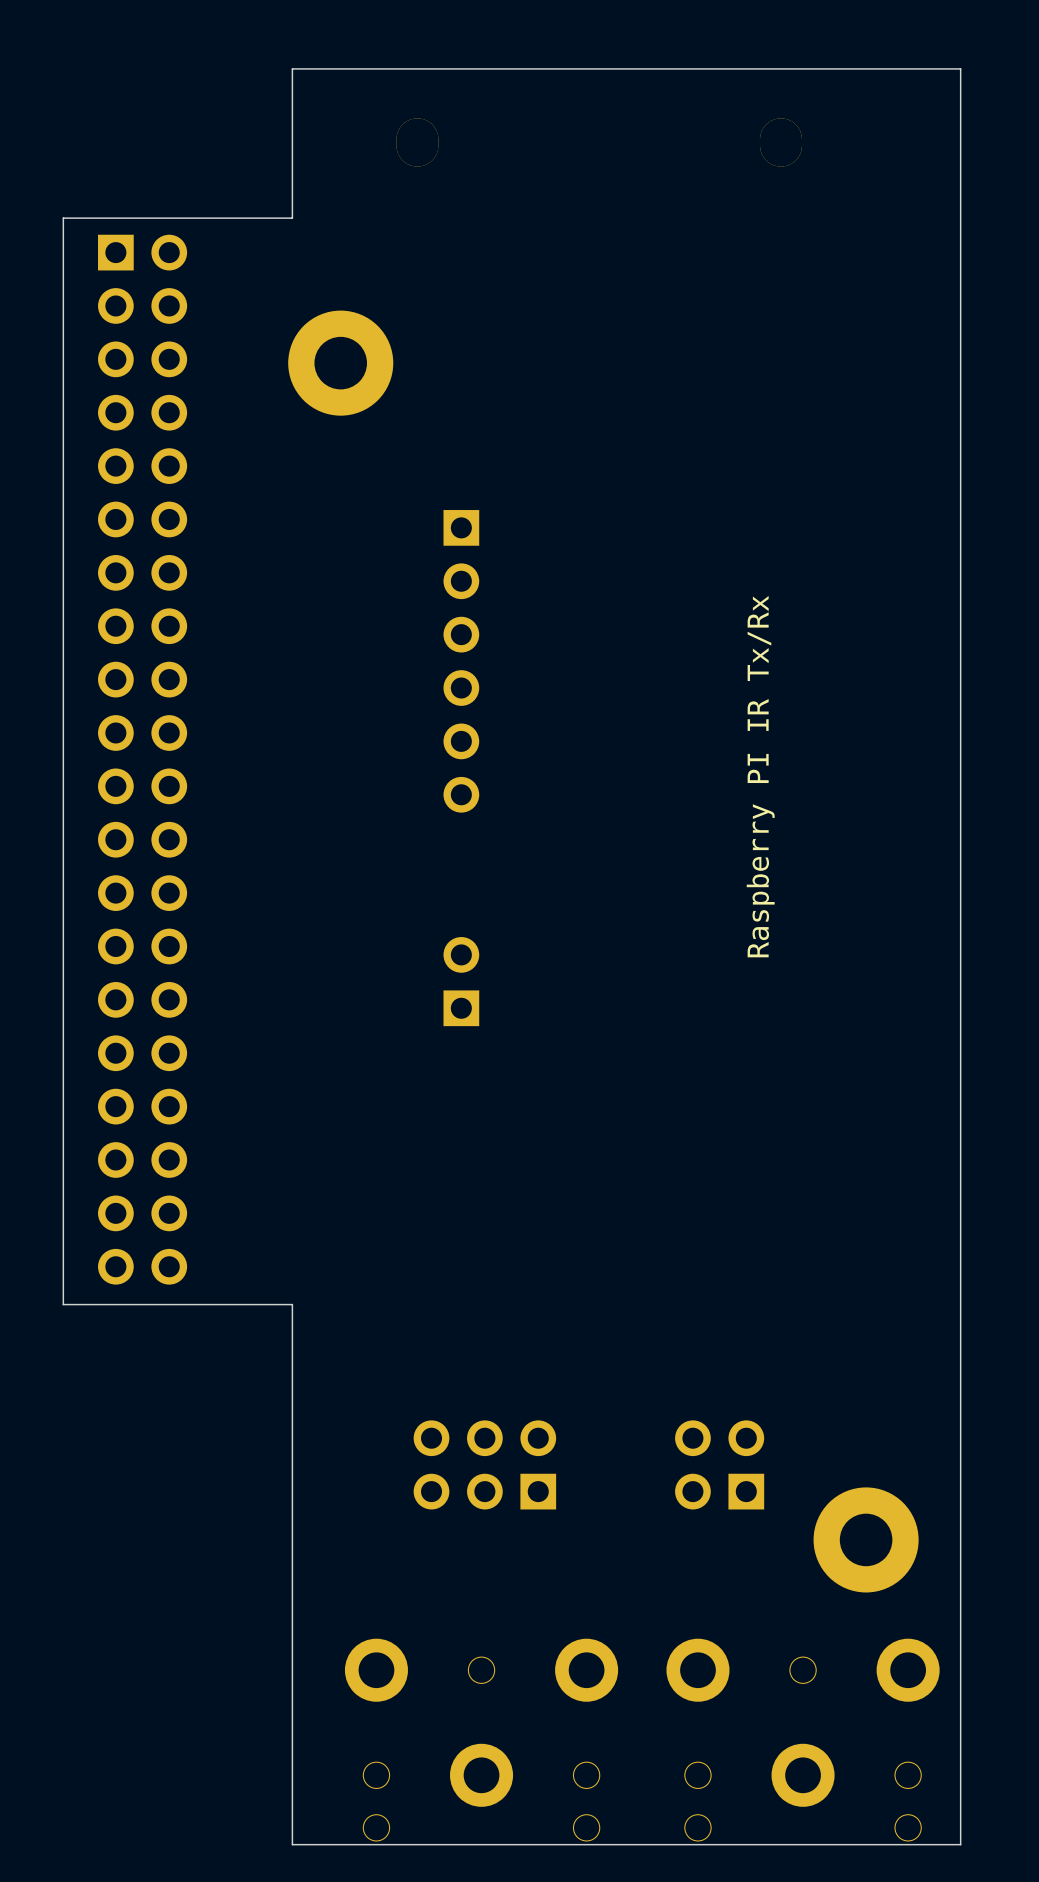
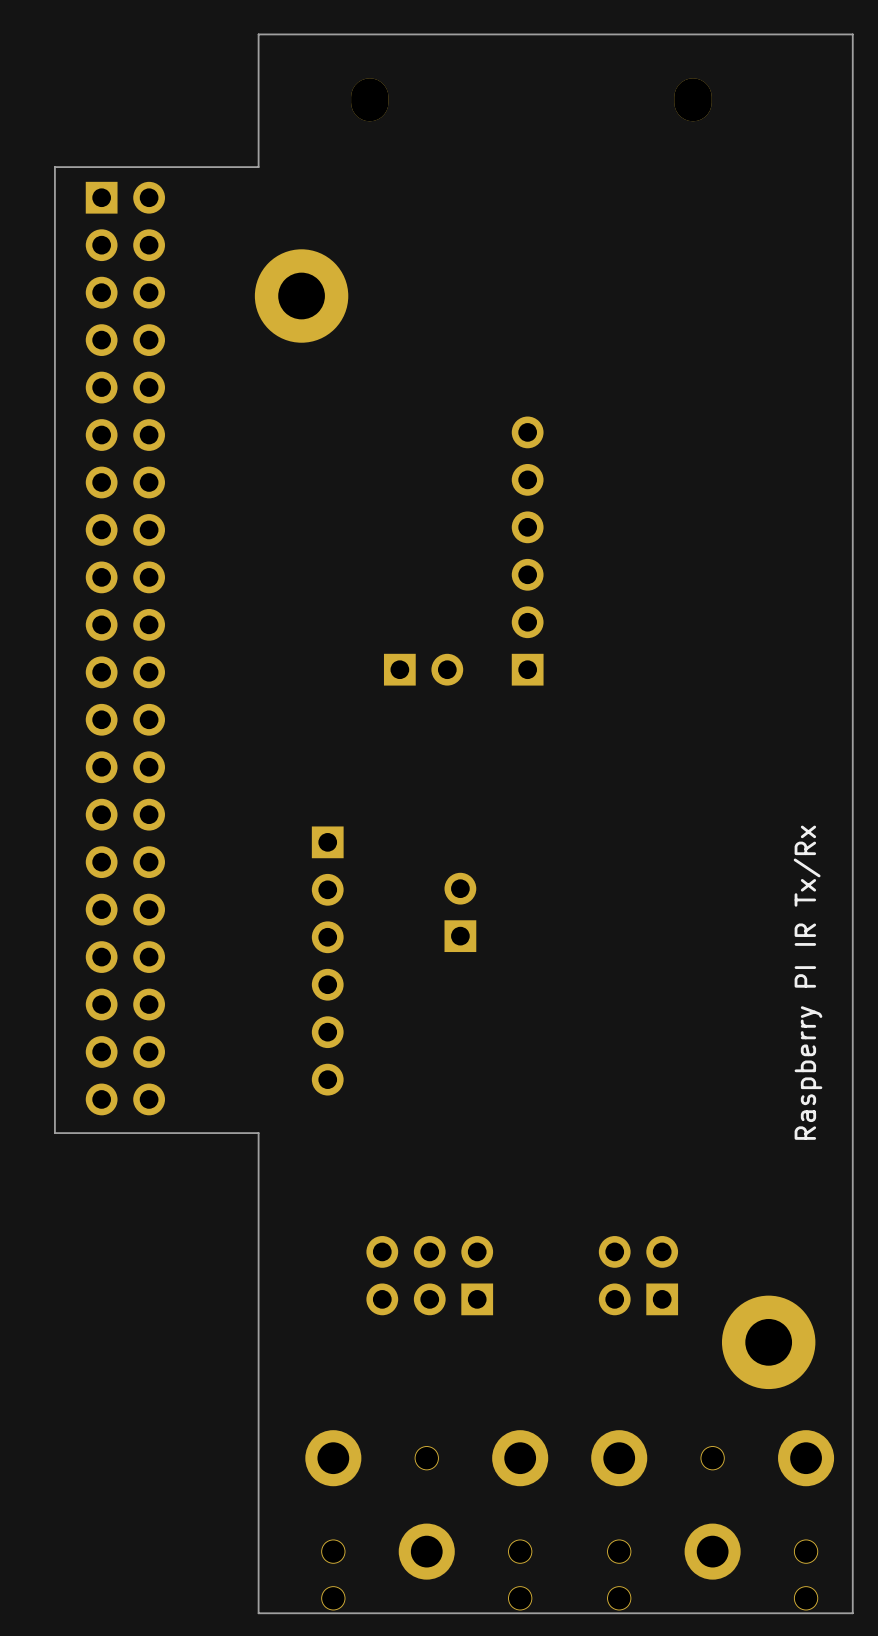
part rotation: 0° (461, 661) -> 180° (527, 551)
text position: Raspberry PI IR Tx/Rx (760, 776) -> Raspberry PI IR Tx/Rx (808, 982)
part: none -> (423, 669)
part position: (461, 981) -> (460, 912)
part: none -> (327, 960)

